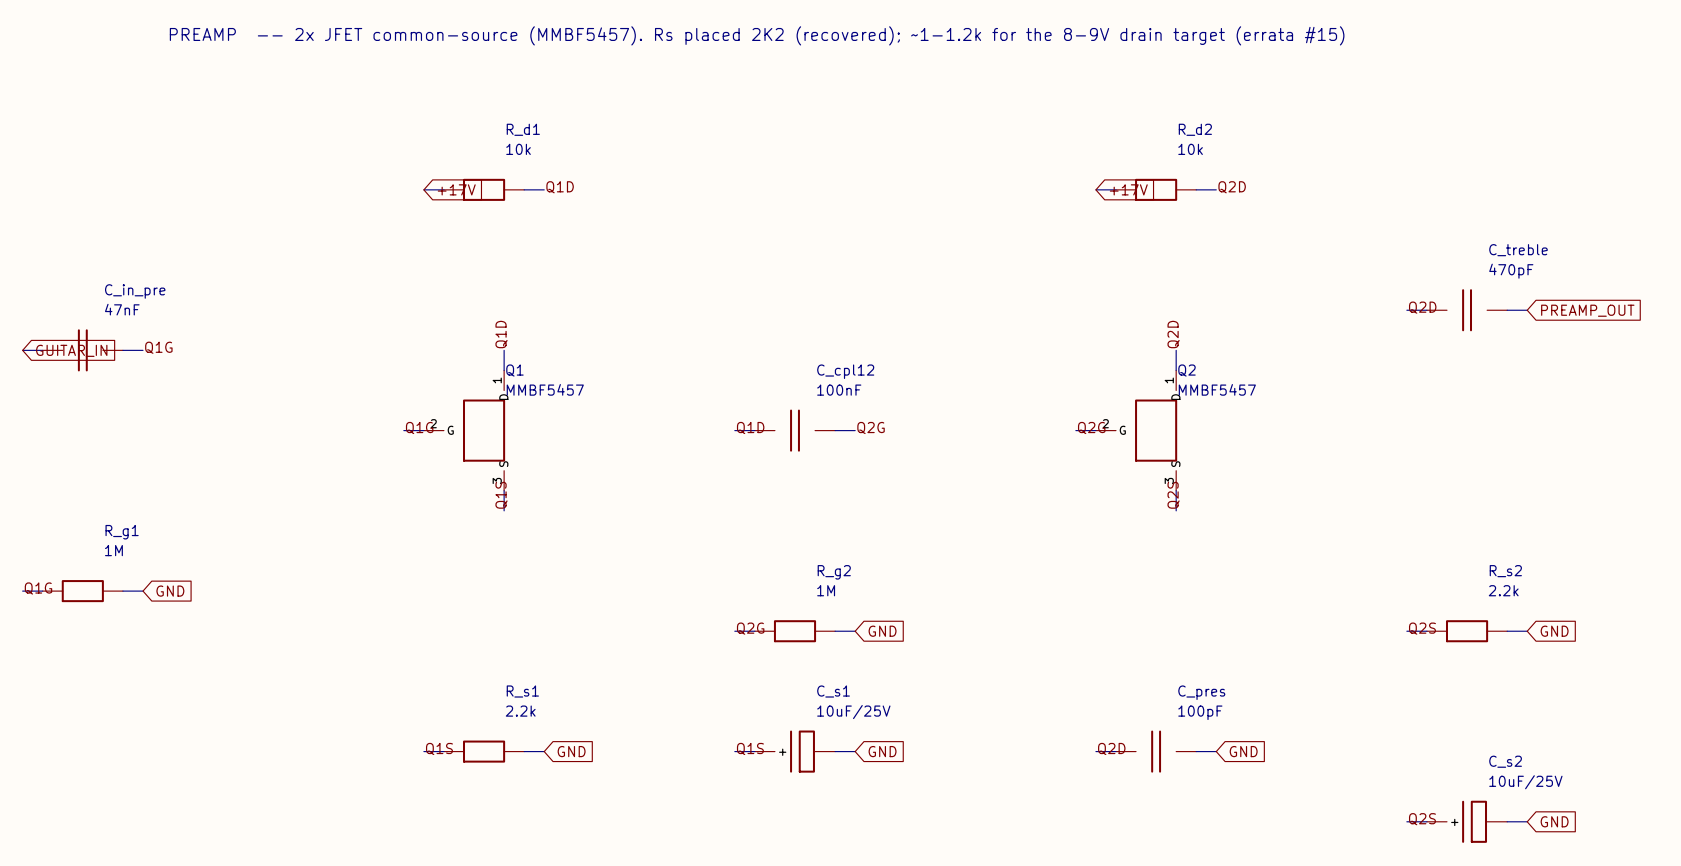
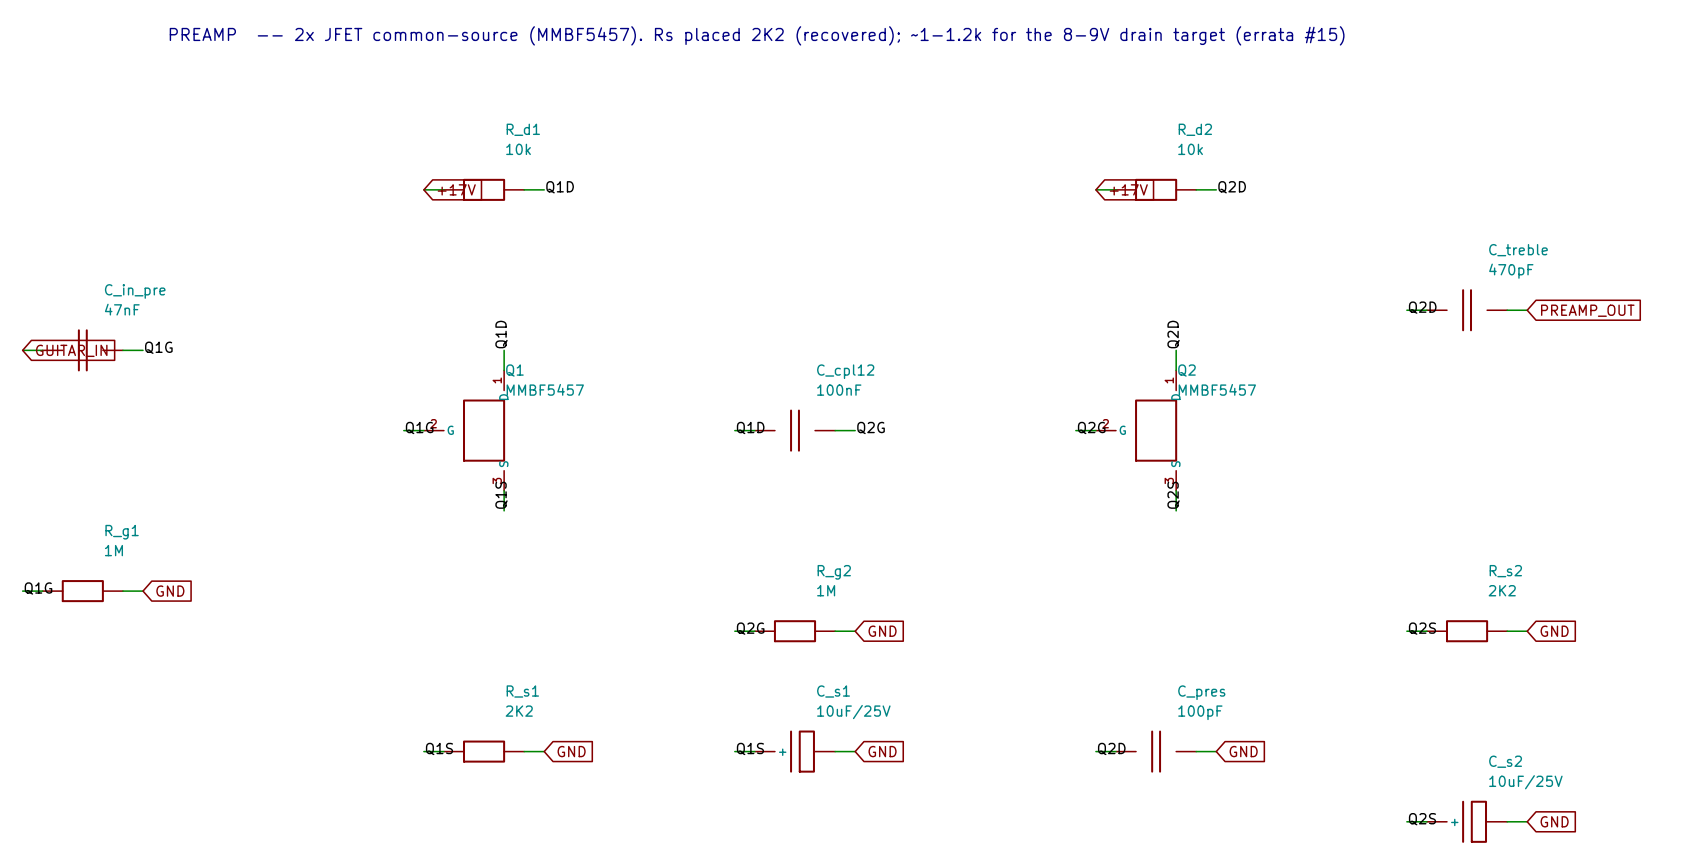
R_s2 value: 2.2k (1503, 590) -> 2K2 (1502, 590)
R_s1 value: 2.2k (520, 711) -> 2K2 (519, 711)

